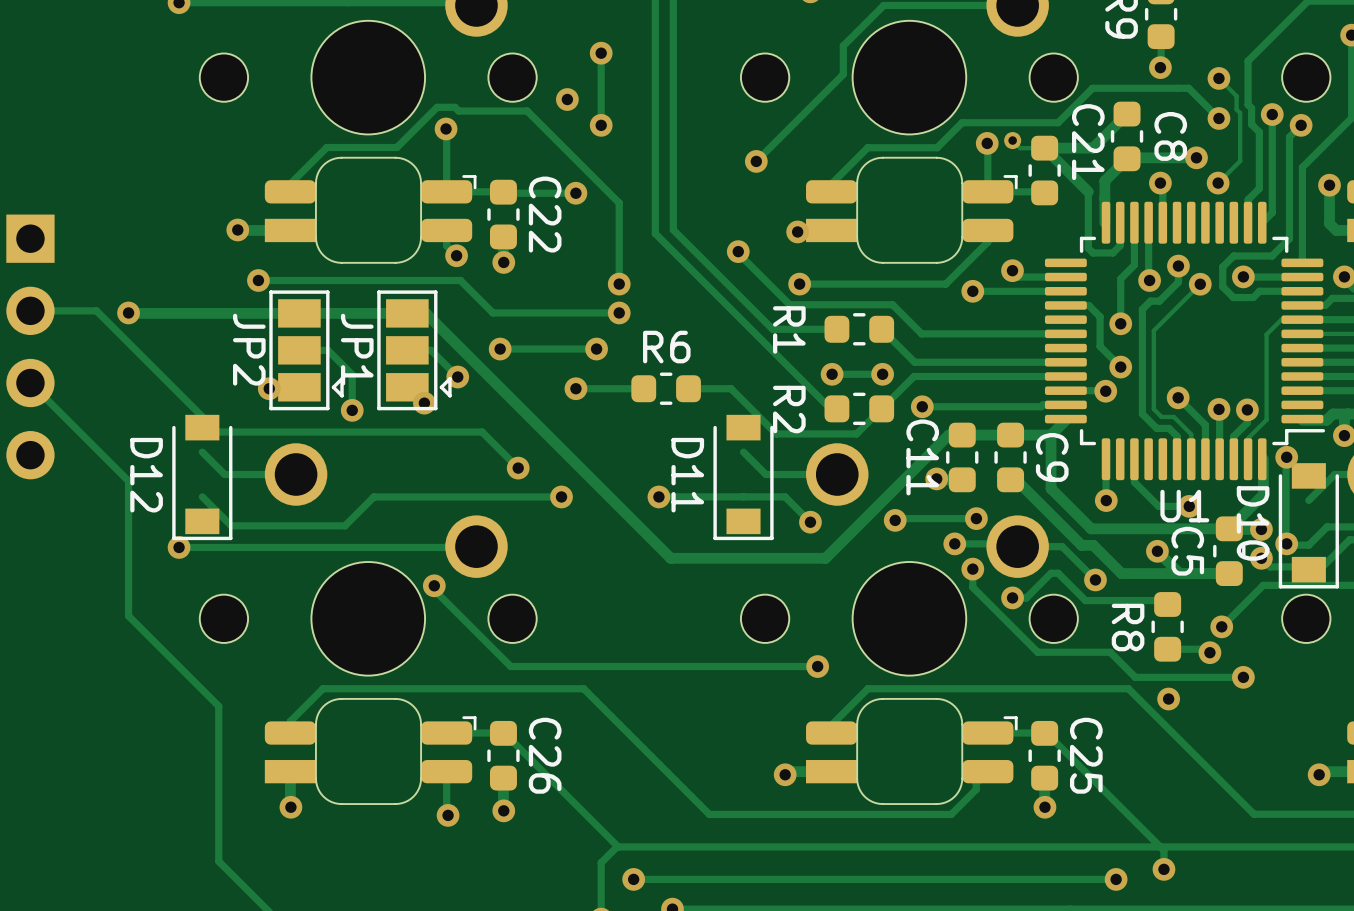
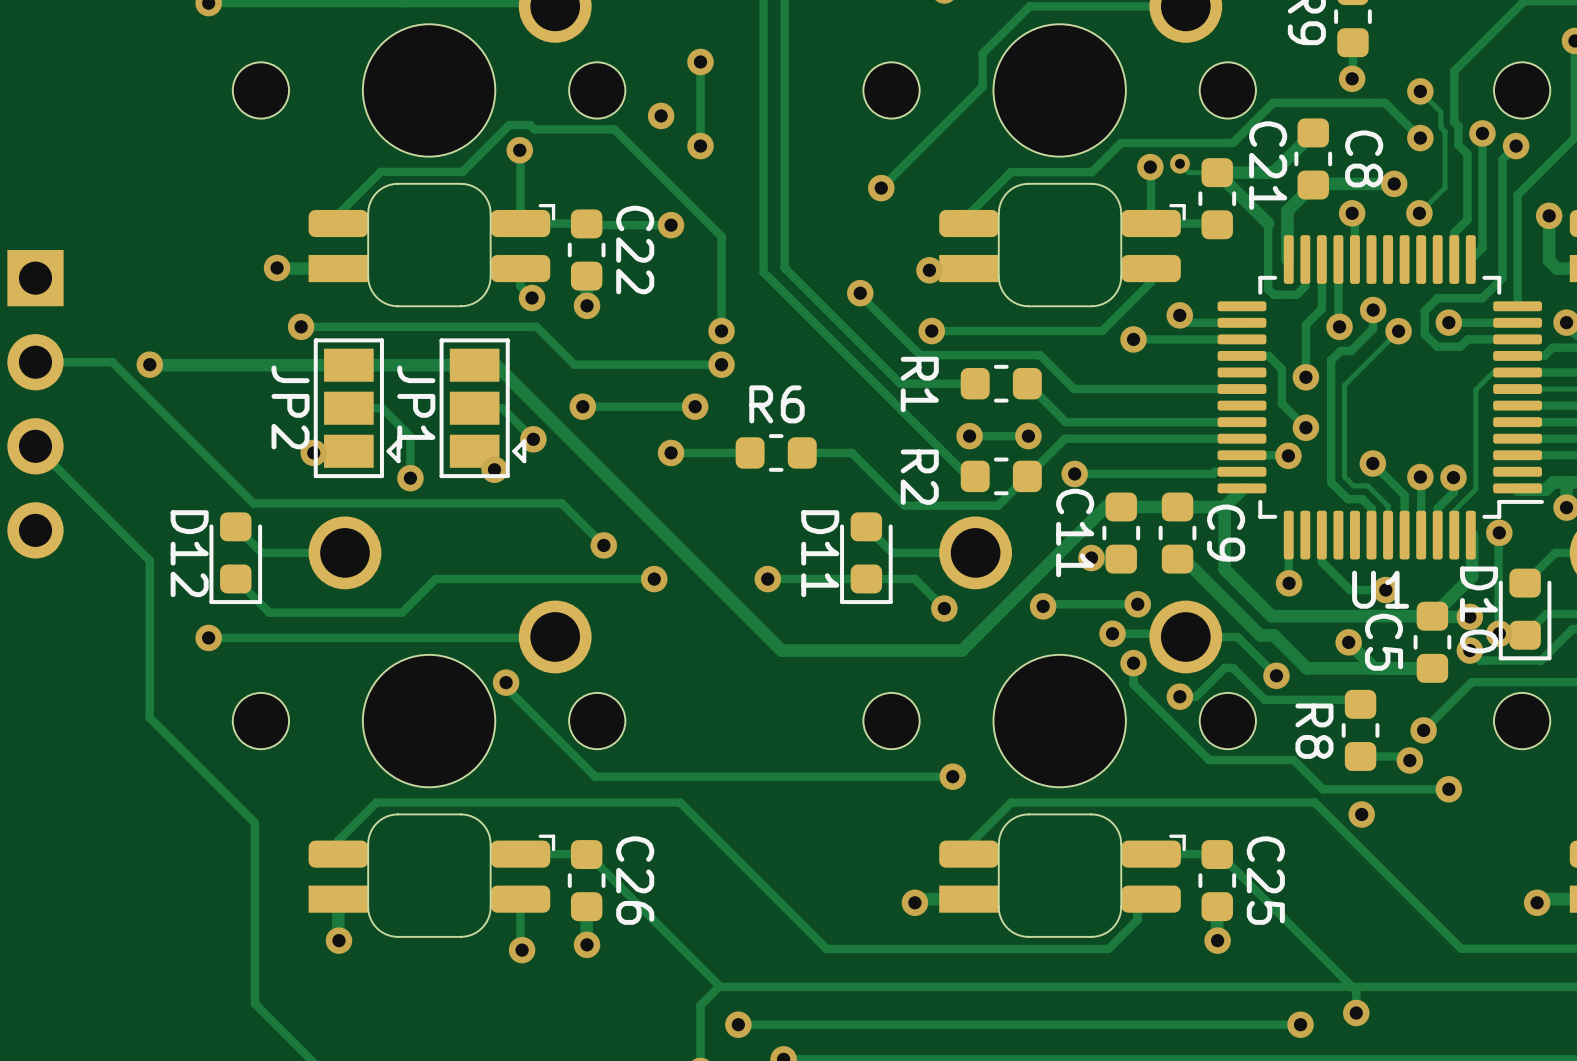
D12 footprint: [172, 414, 233, 541] -> [209, 512, 263, 605]
D11 footprint: [713, 414, 774, 541] -> [840, 512, 893, 605]
D10 footprint: [1278, 463, 1339, 589] -> [1498, 568, 1552, 661]

